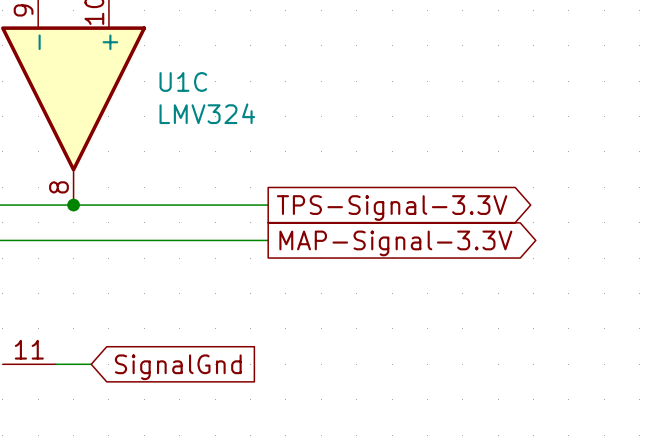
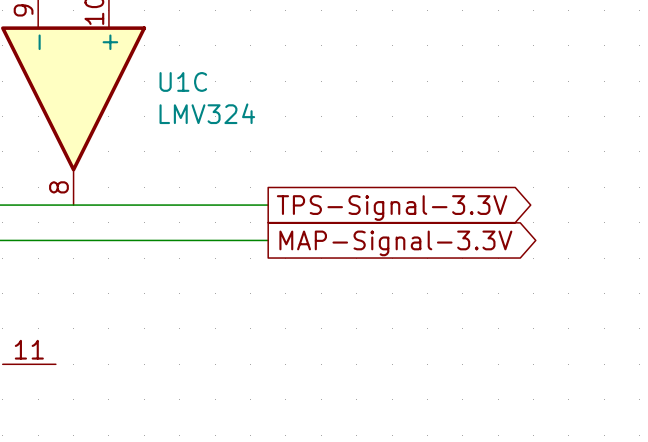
junction: (73, 205) -> none
wire: (55, 364) (91, 364) -> none
global label: SignalGnd (178, 367) -> none

